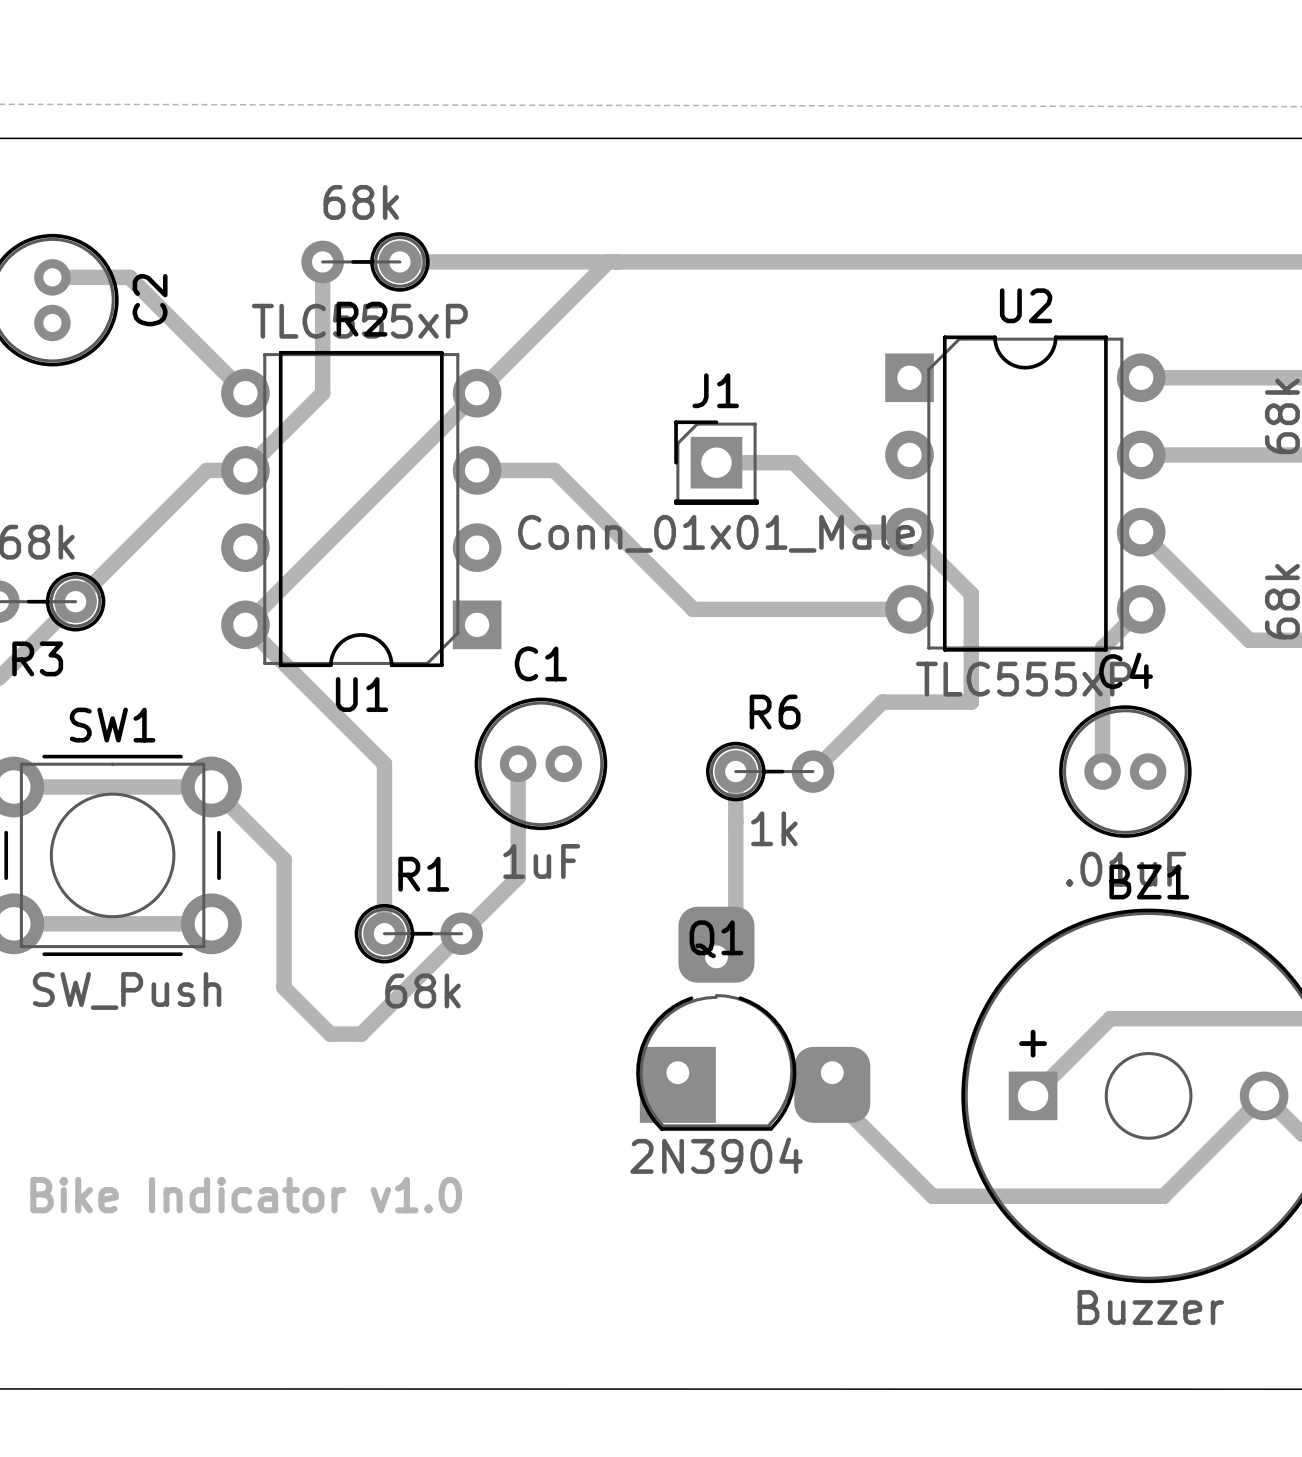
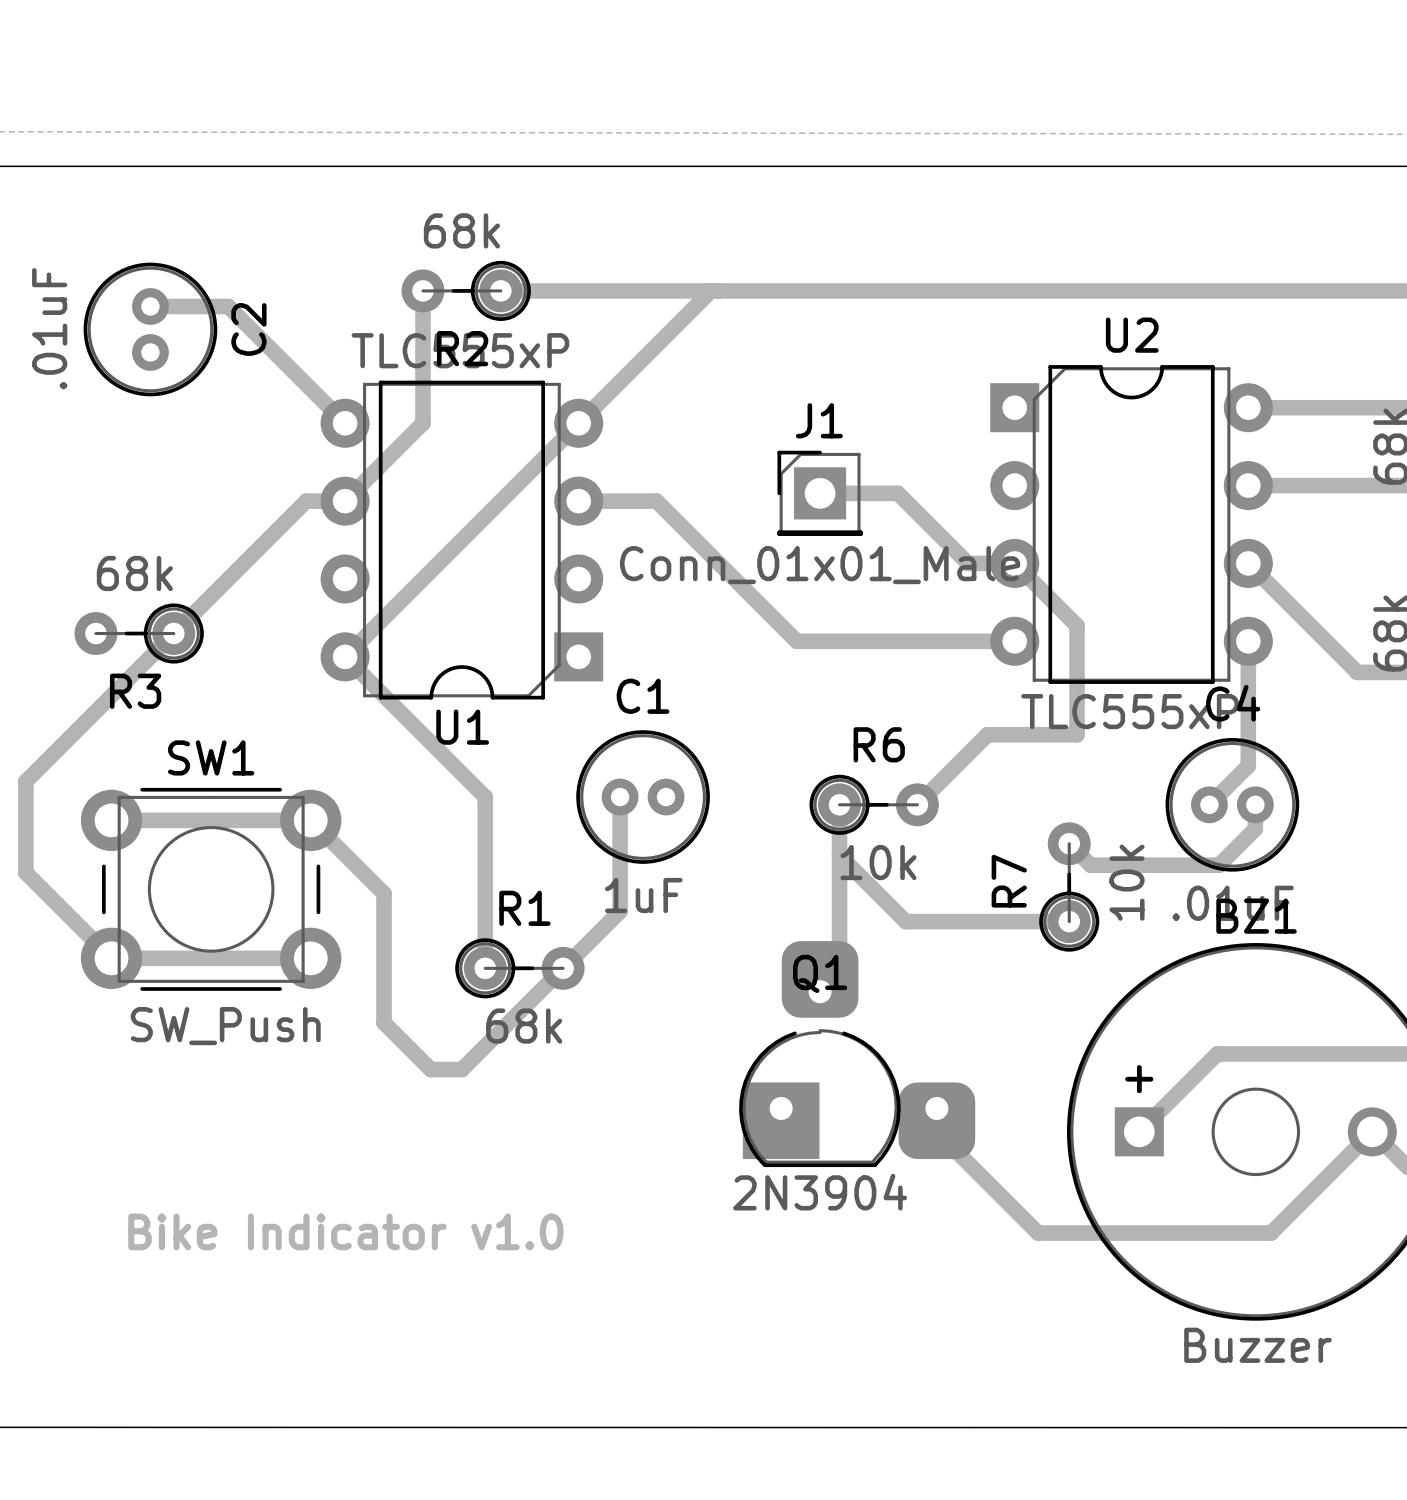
track: (1141, 609) (1102, 648) (1102, 771) -> (1248, 641) (1248, 765) (1209, 804)
track: none -> (1255, 804) (1255, 828) (1219, 865) (1090, 865) (1069, 843)
track: none -> (839, 855) (905, 921) (1069, 921)
R6 value: 1k (774, 828) -> 10k (878, 862)
R7: none -> 10k (1069, 886)

